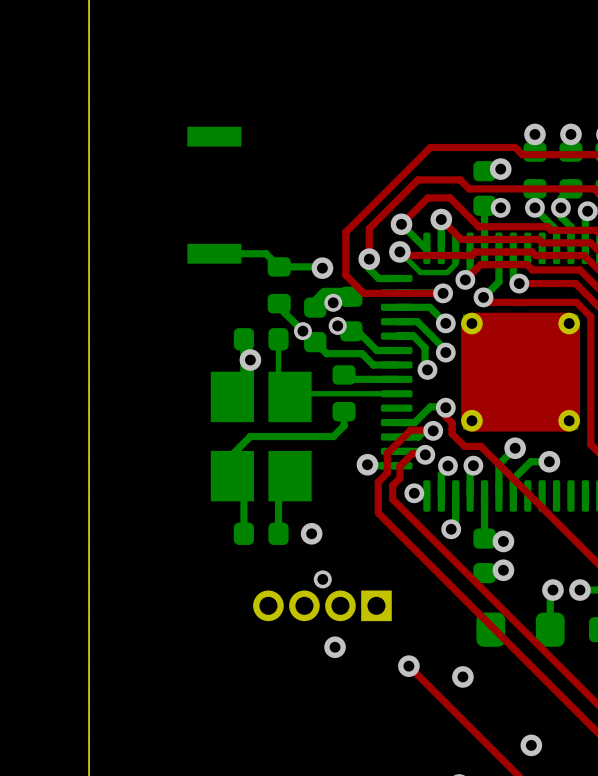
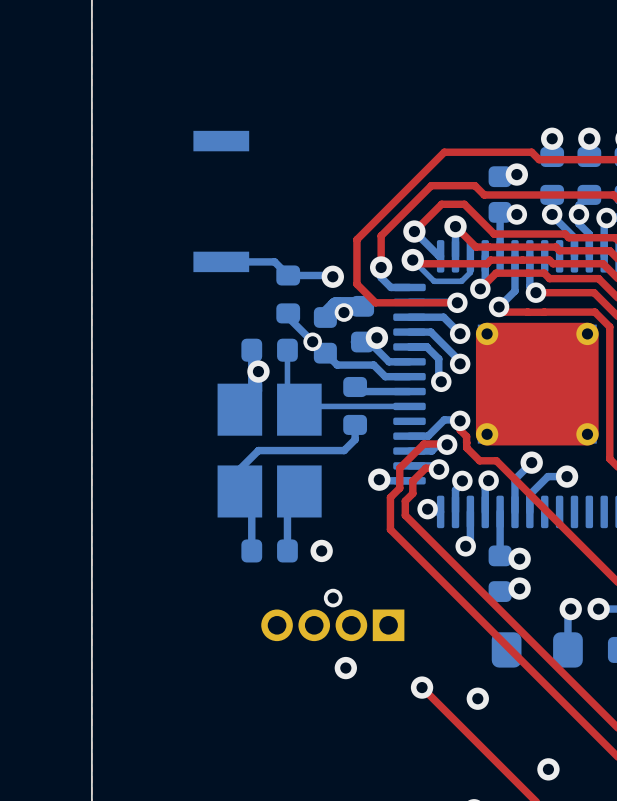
via: (337, 325) -> none
via: none -> (376, 337)

